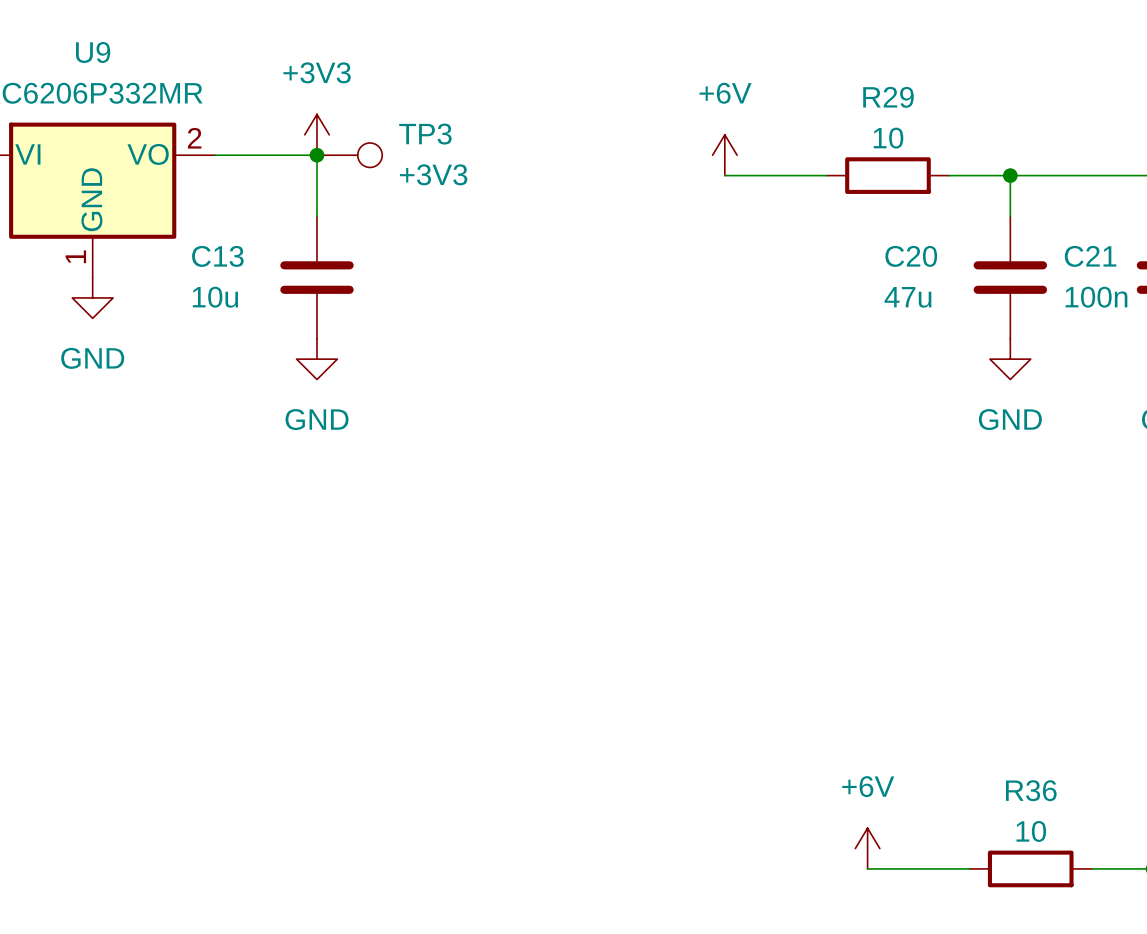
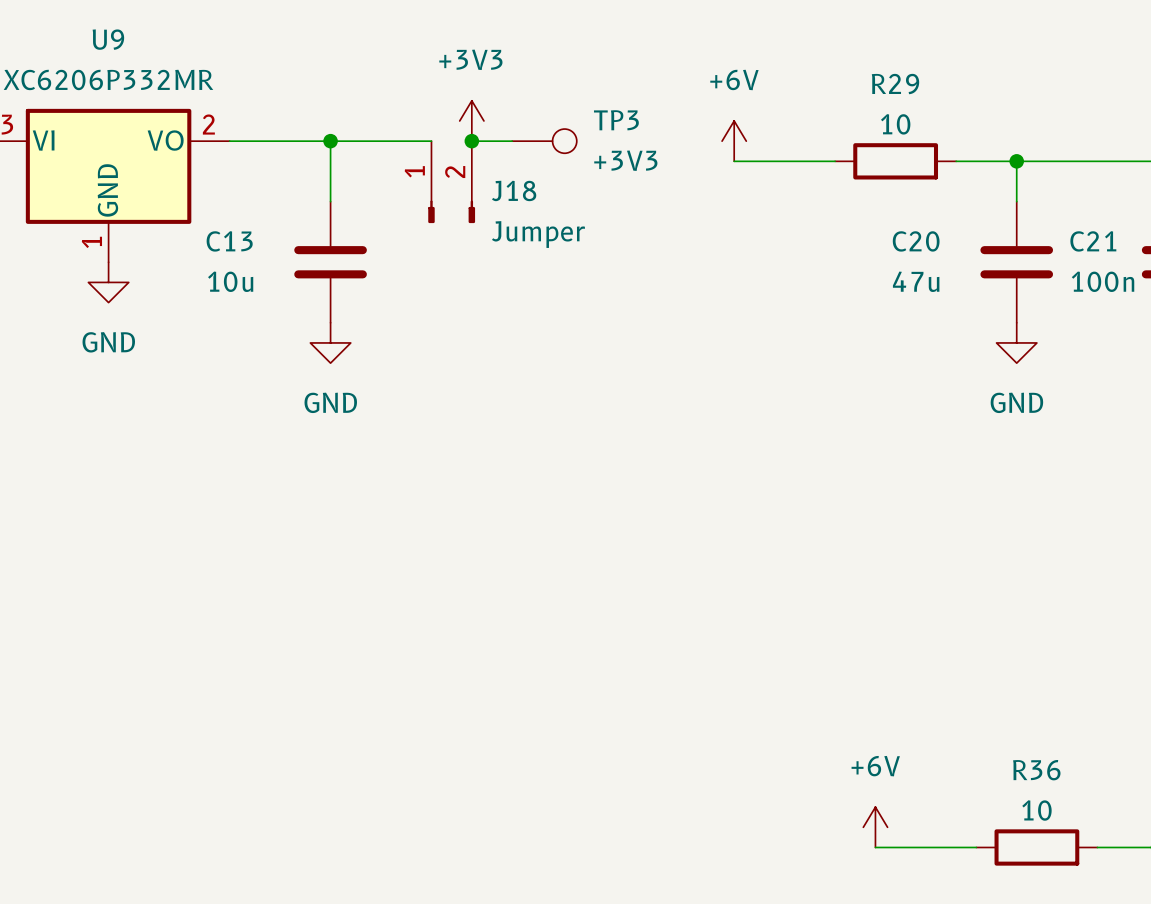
power symbol position: +3V3 (316, 134) -> +3V3 (471, 120)
wire: none -> (330, 141) (431, 141)
TP3 position: (349, 155) -> (544, 141)
wire: none -> (471, 141) (512, 141)
junction: none -> (471, 141)
J18: none -> Jumper (451, 182)

